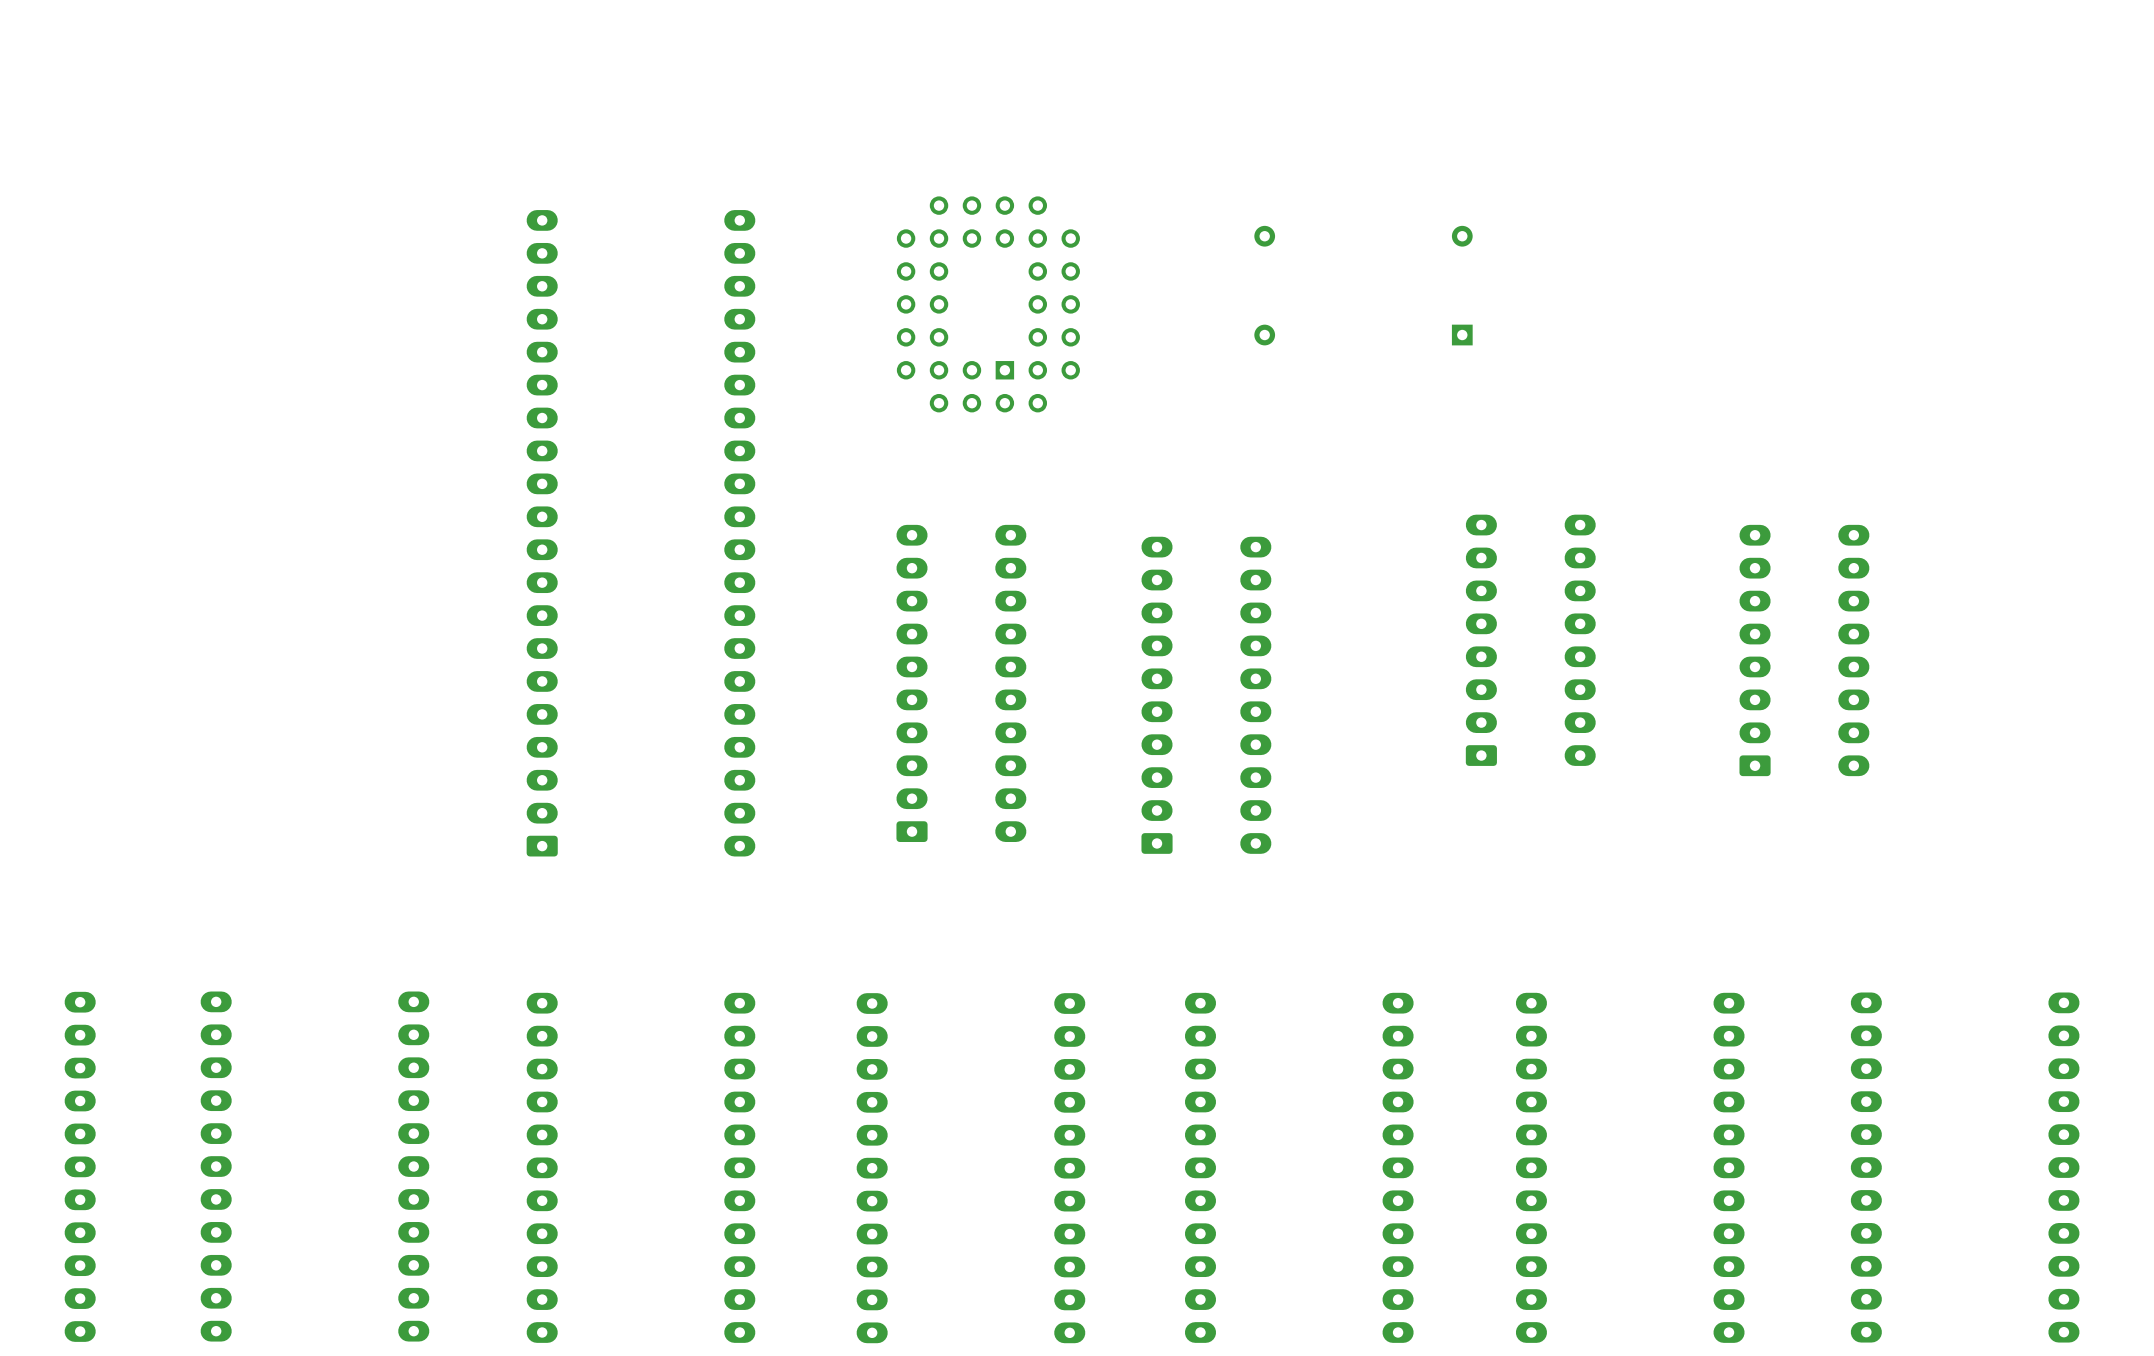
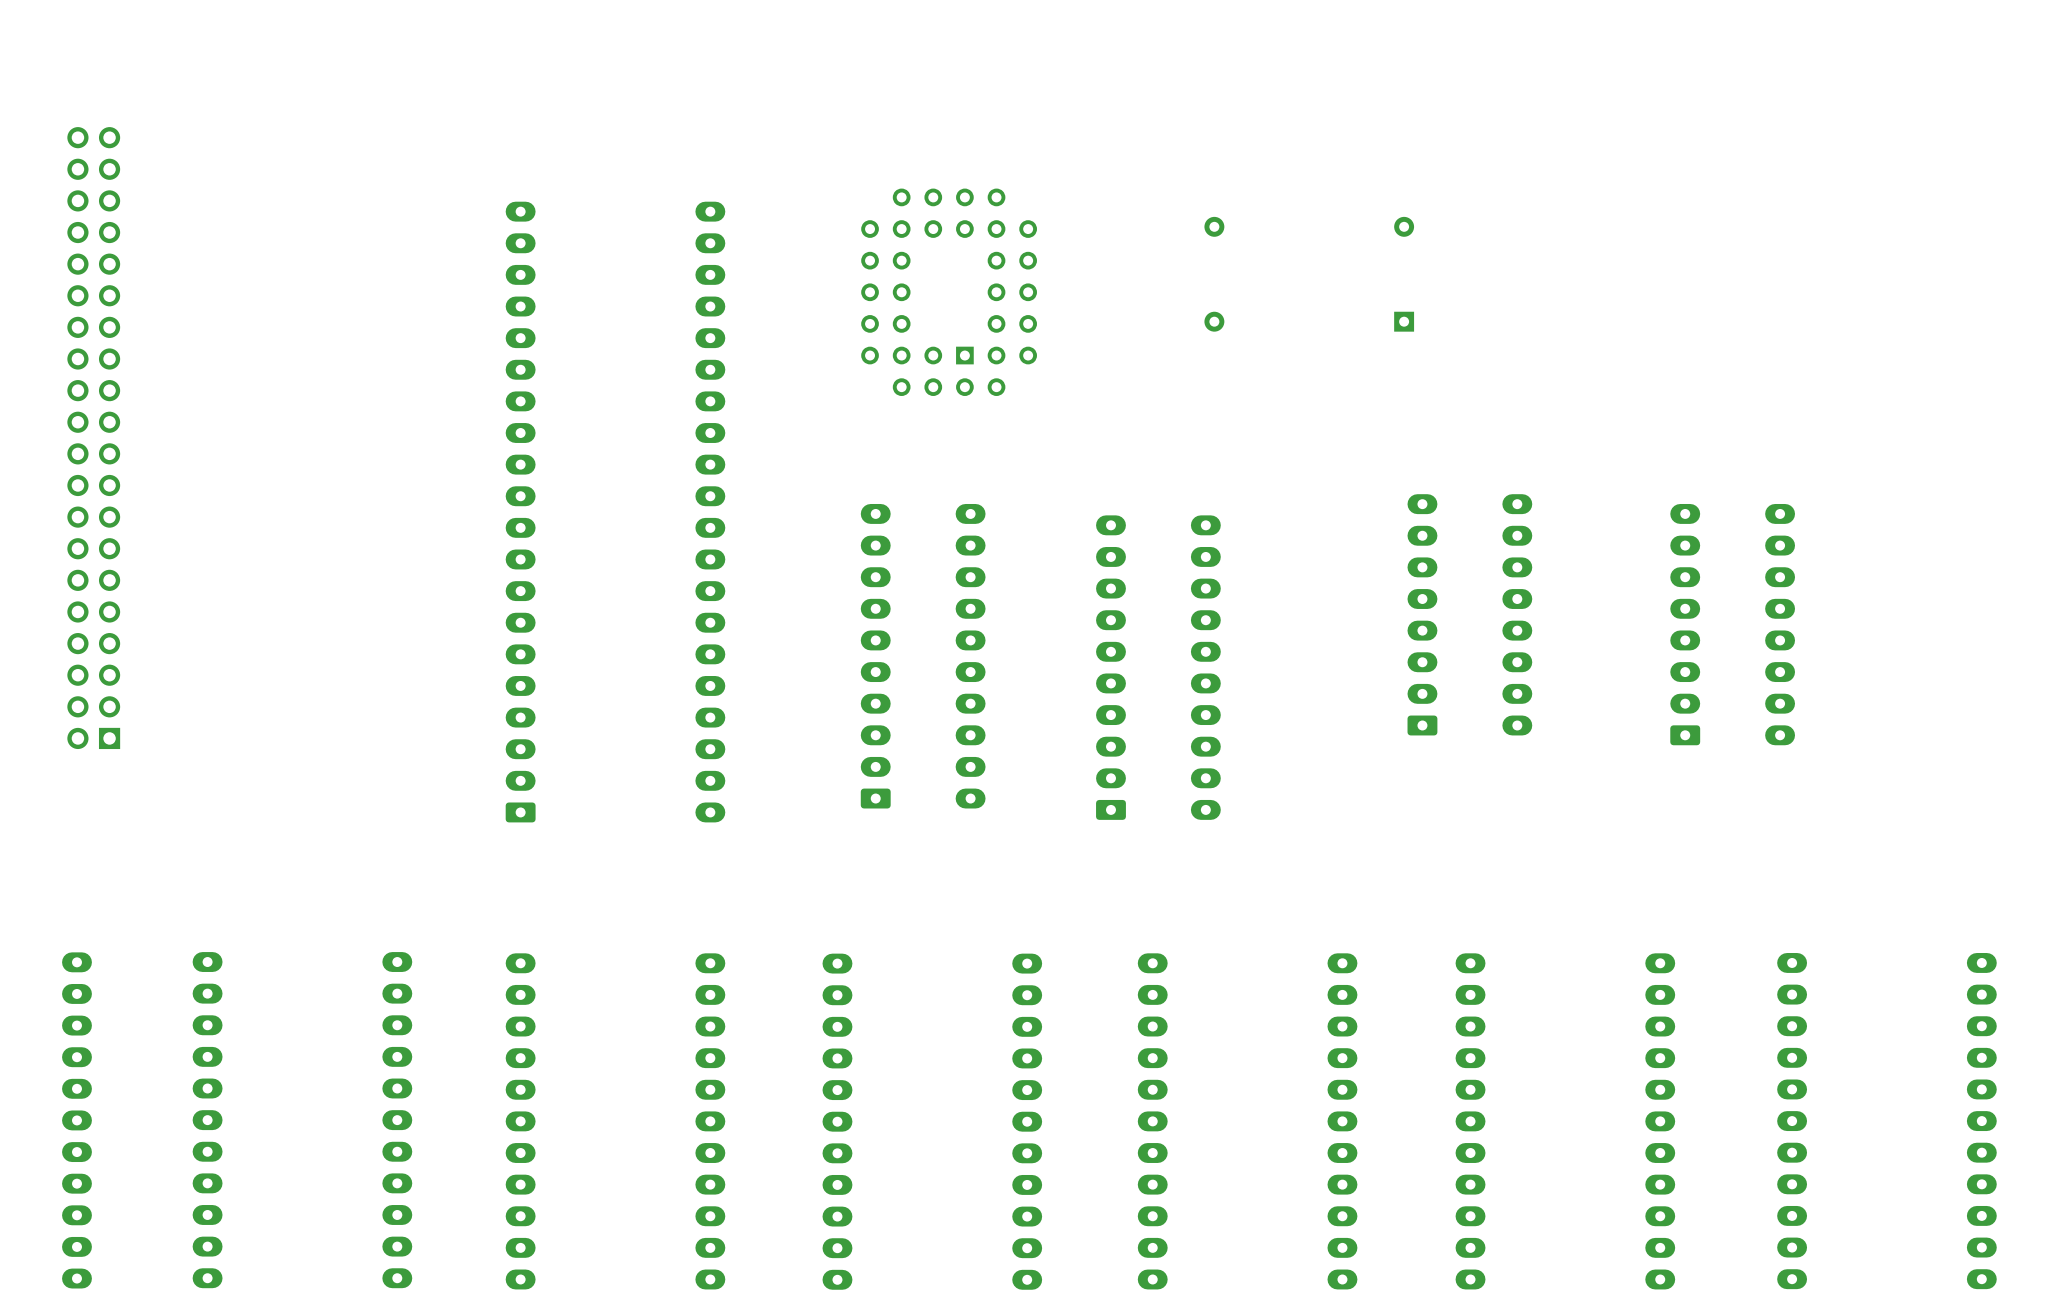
part: none -> (93, 438)

